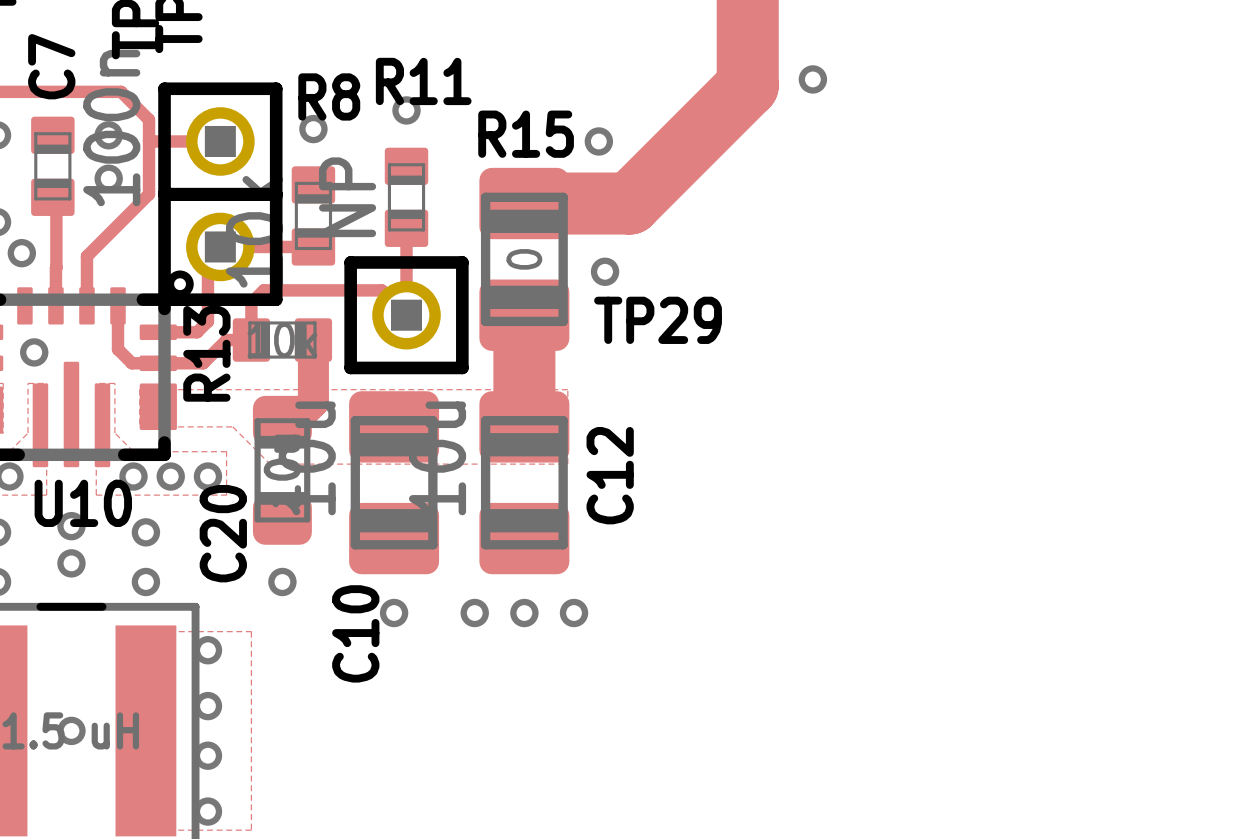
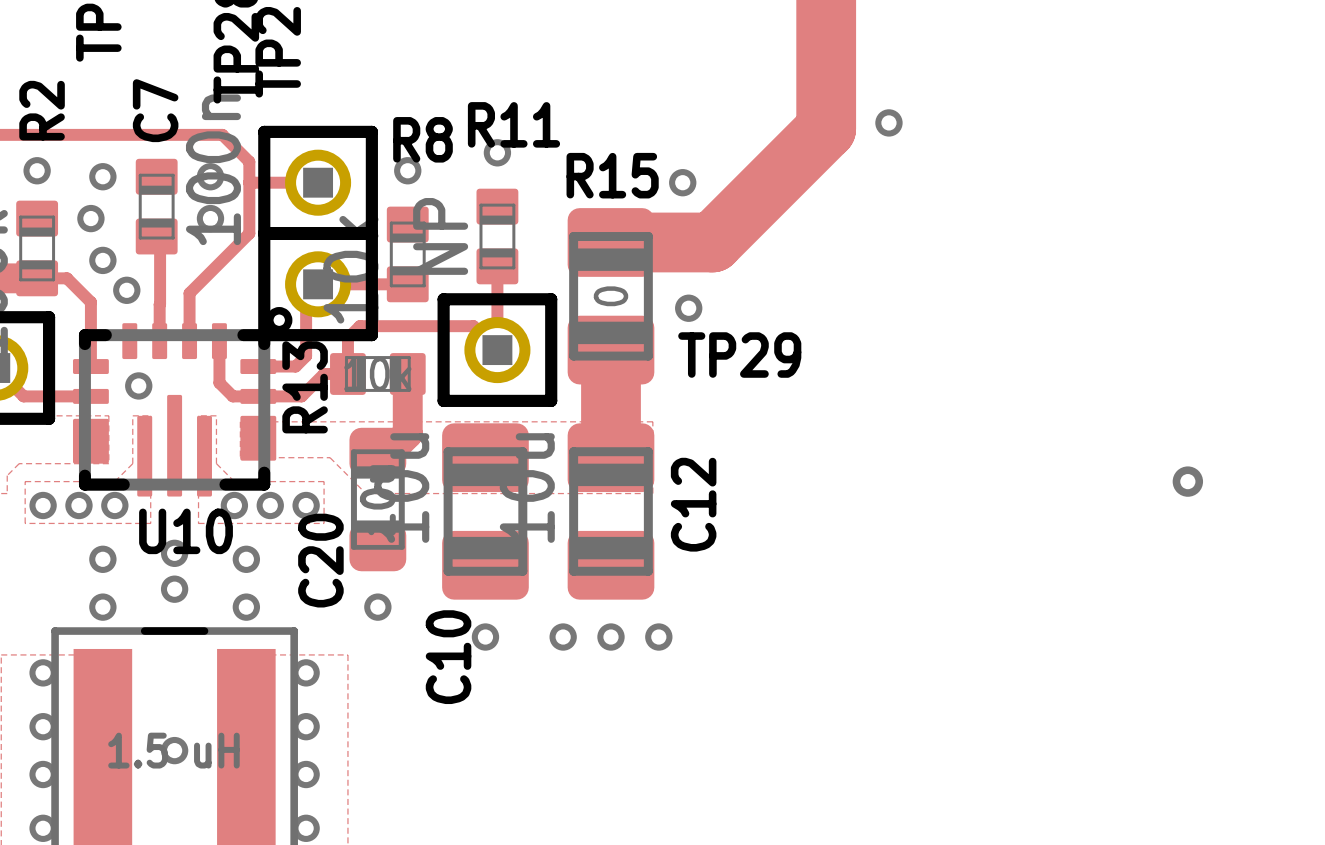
via: none -> (1187, 481)

